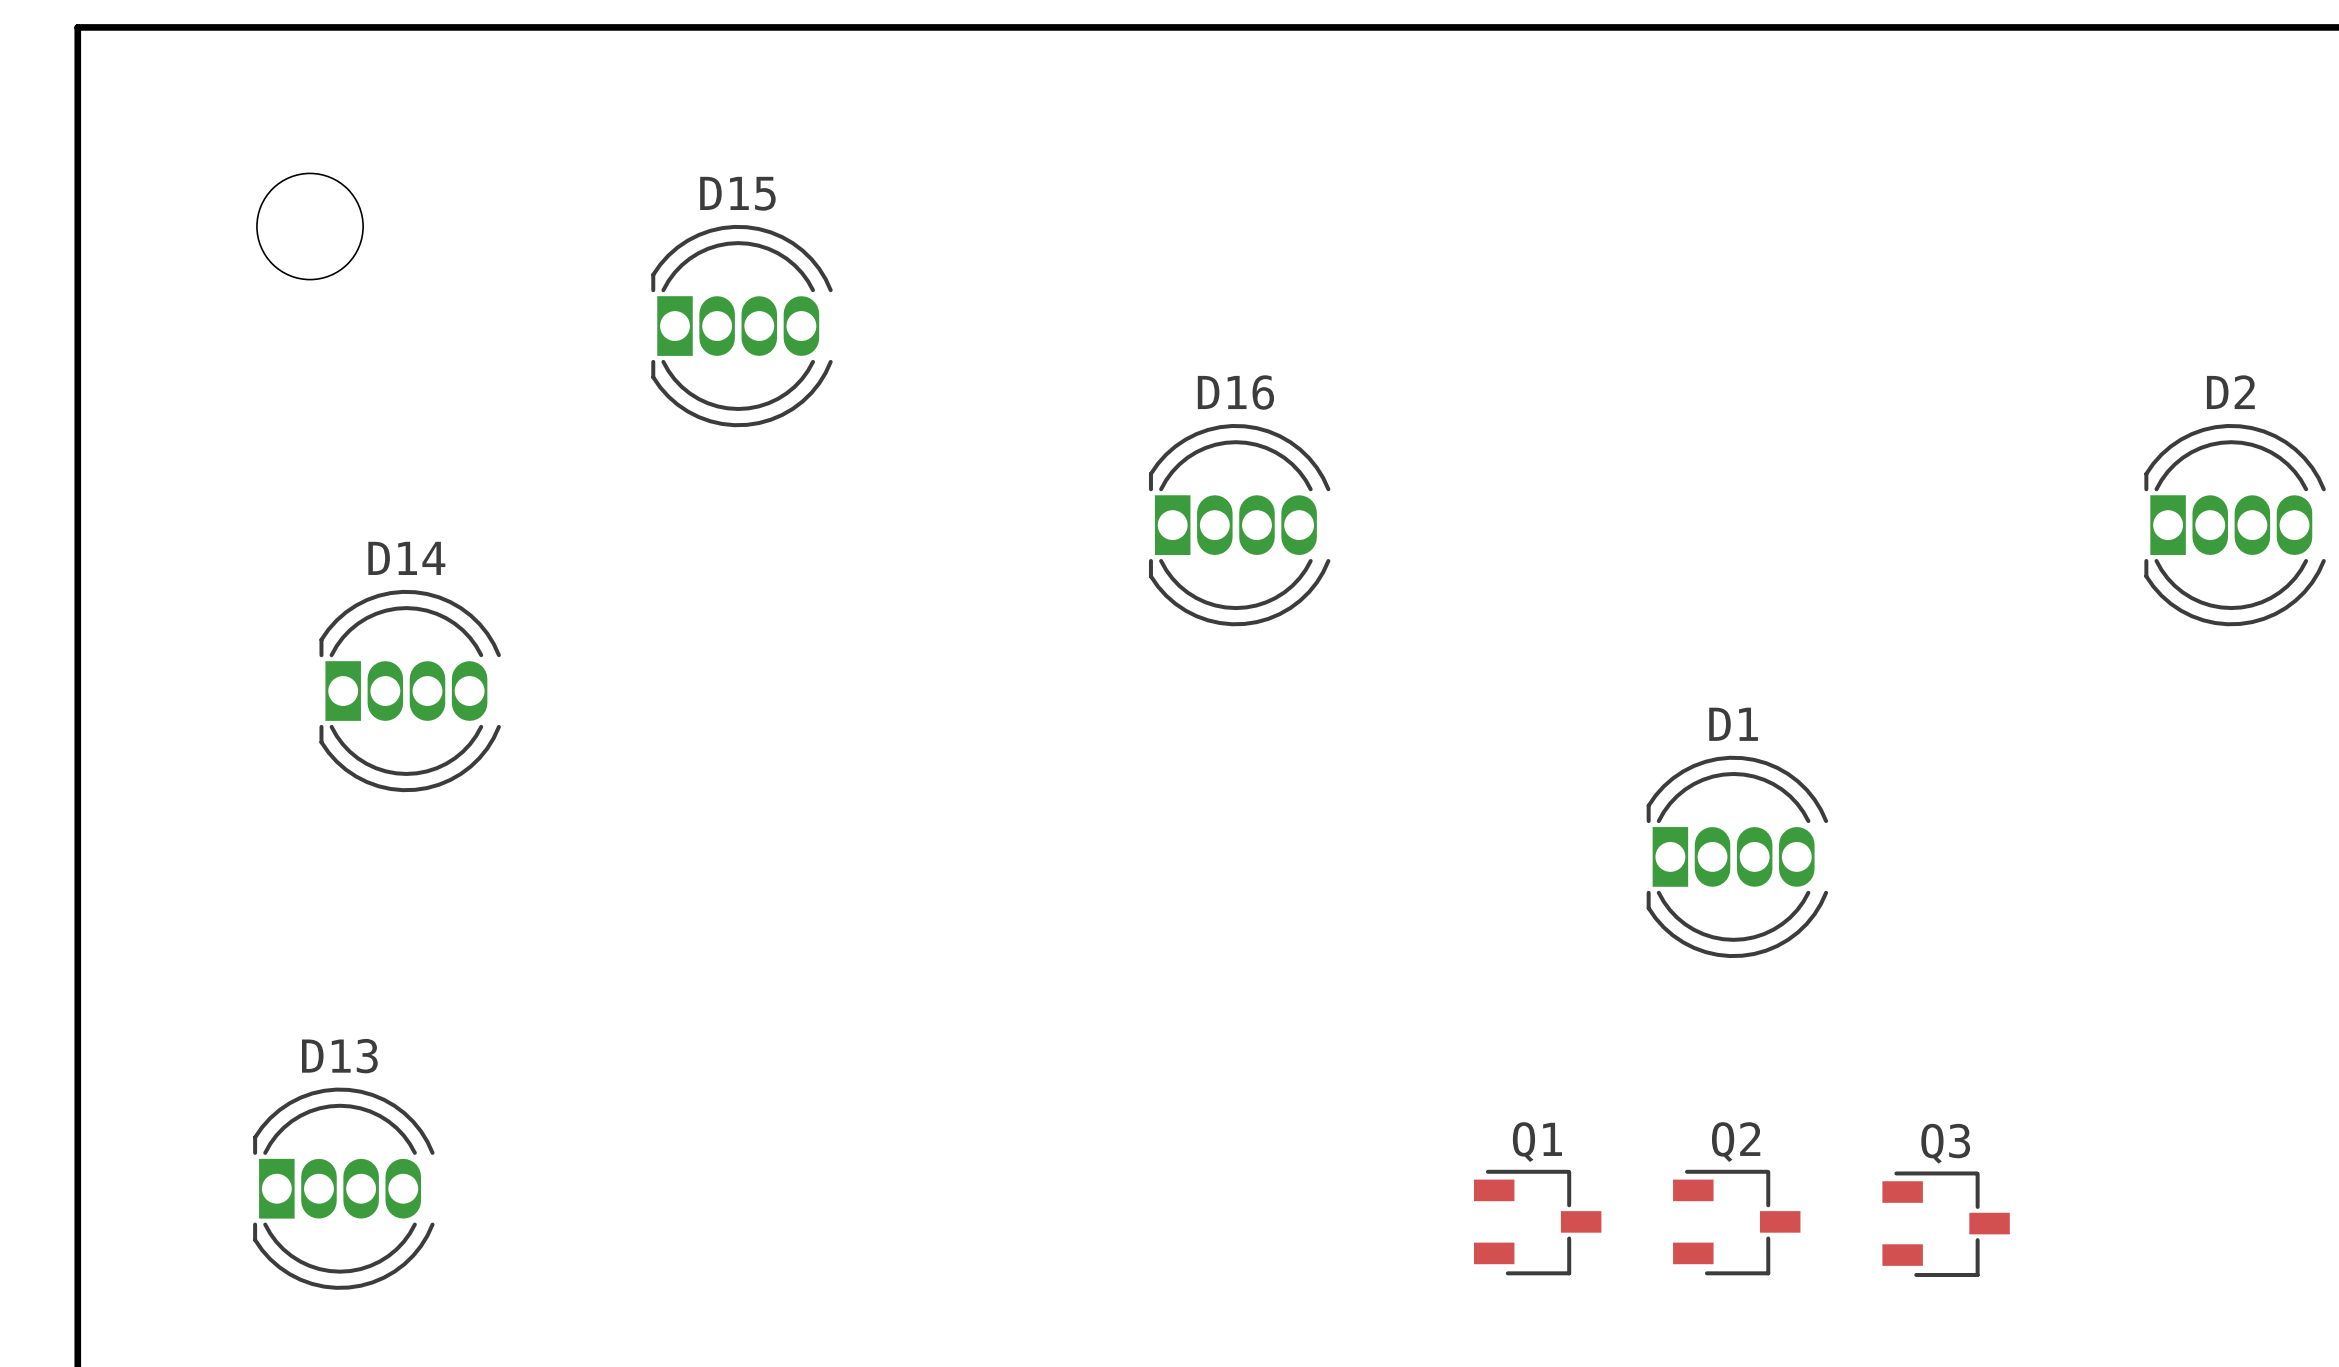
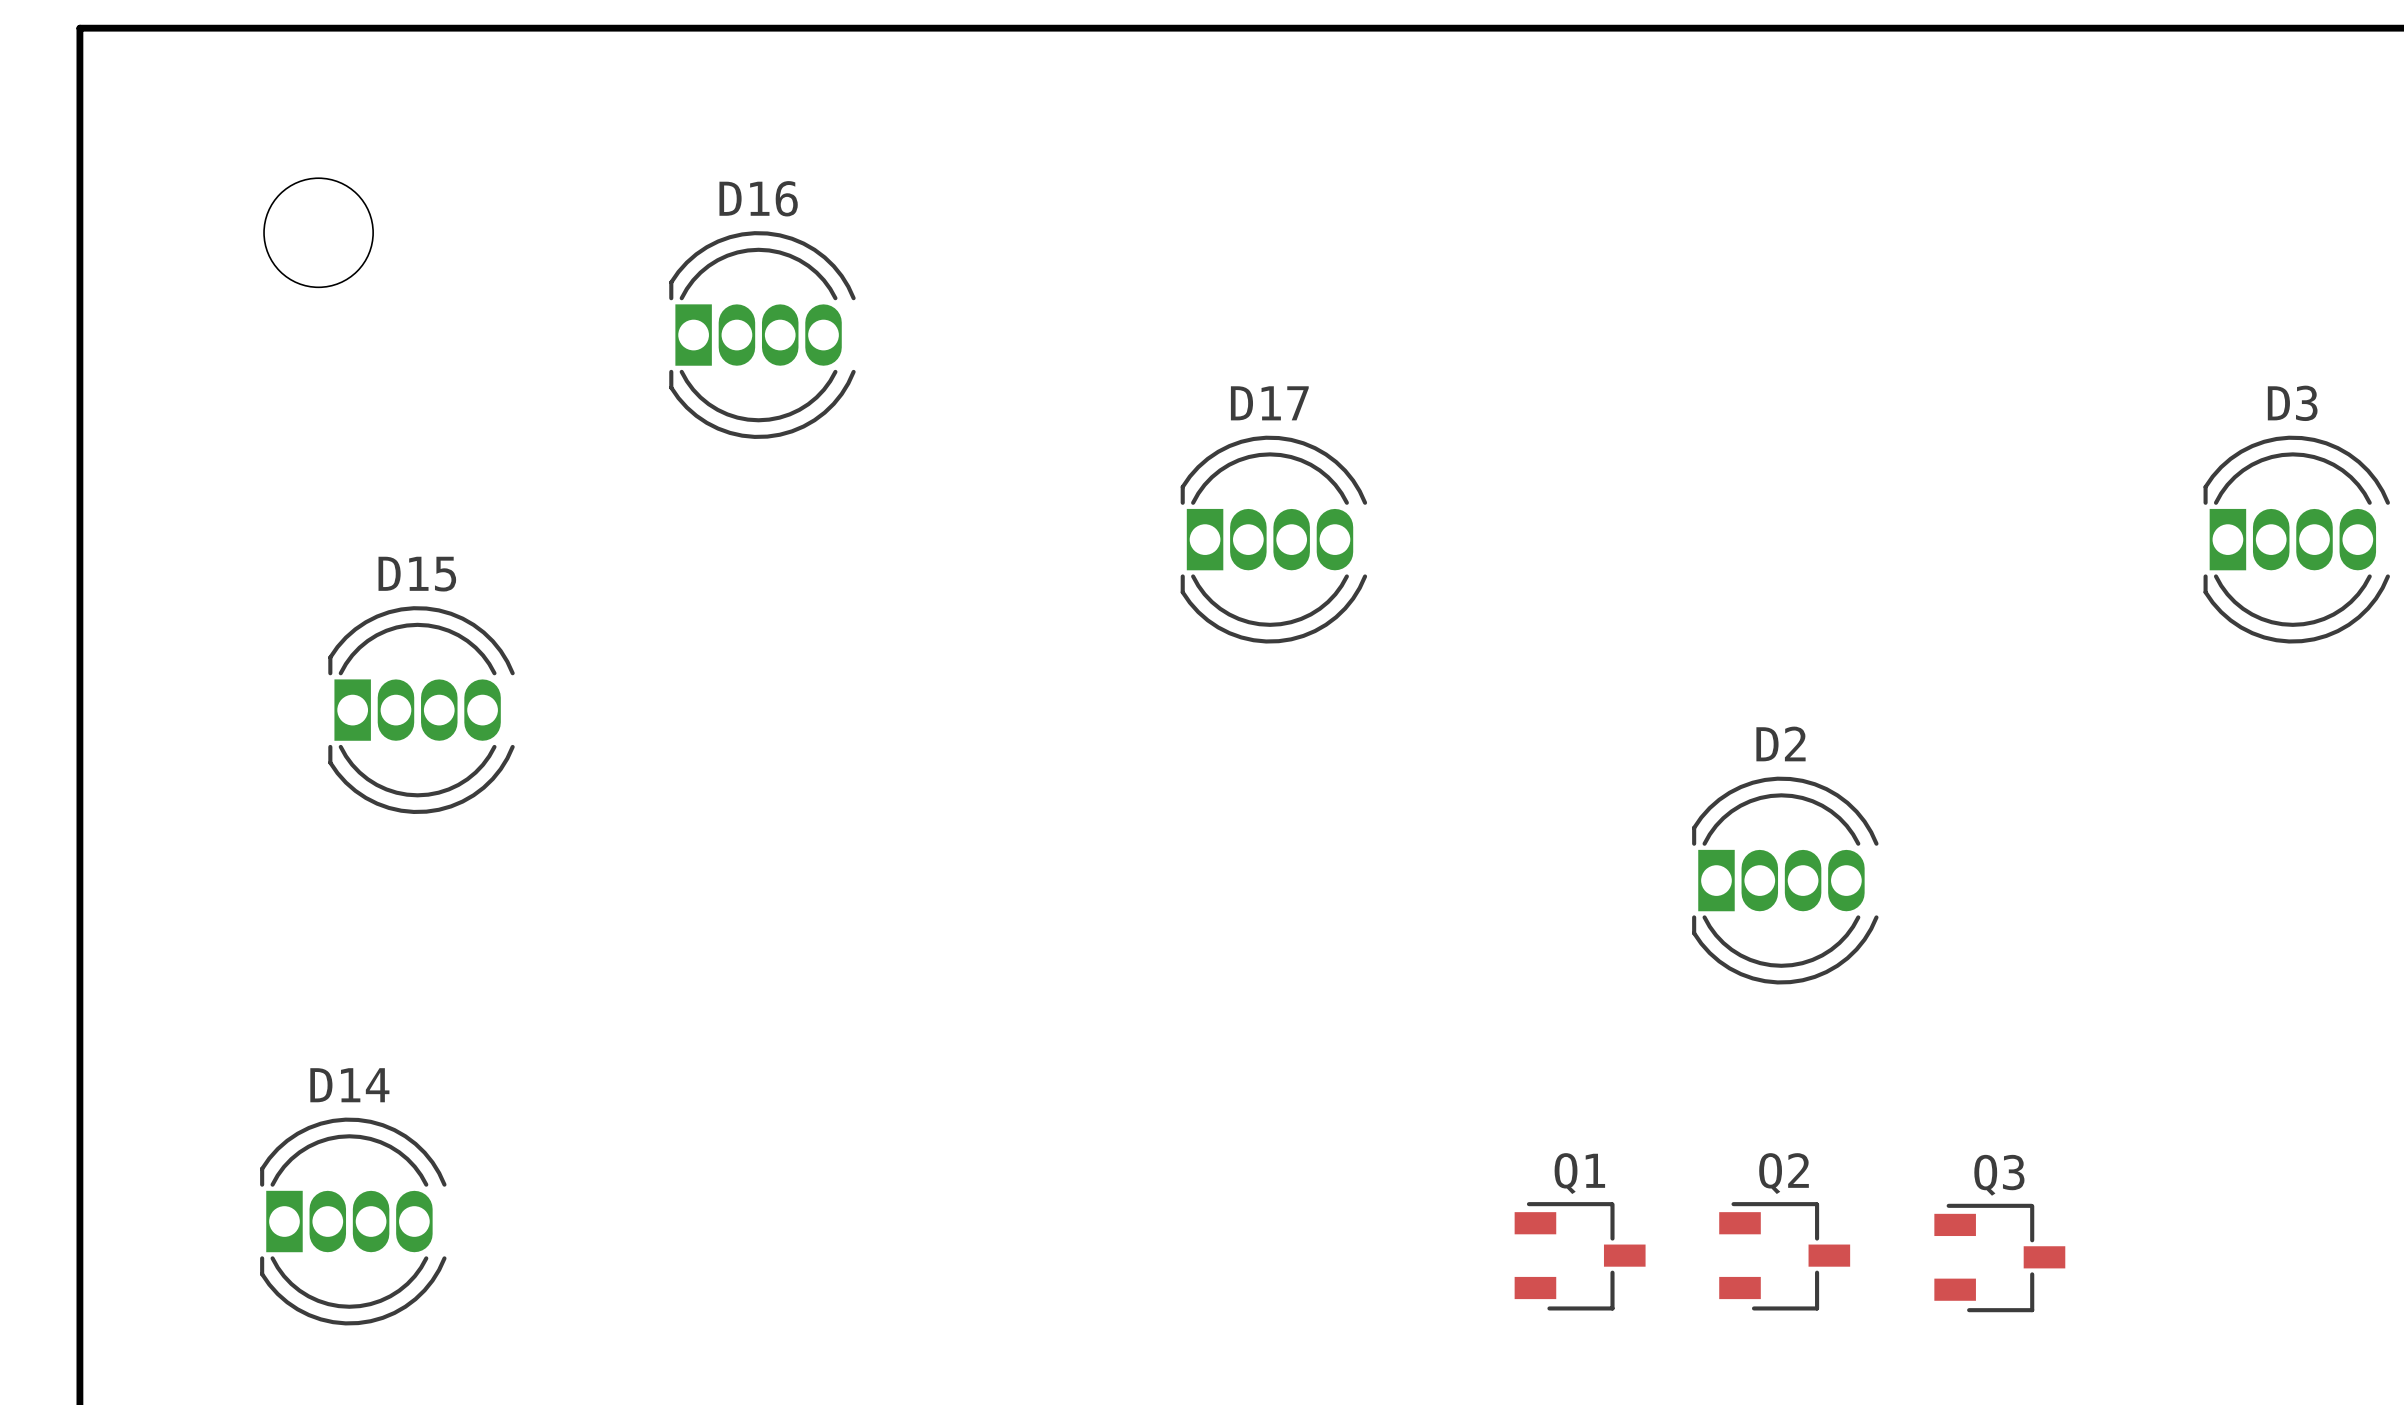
D15 name: D15 (737, 193) -> D16 (758, 198)
D16 name: D16 (1235, 392) -> D17 (1269, 403)
D2 name: D2 (2230, 392) -> D3 (2292, 403)
D14 name: D14 (406, 558) -> D15 (417, 574)
D1 name: D1 (1733, 724) -> D2 (1781, 743)
D13 name: D13 (339, 1056) -> D14 (349, 1085)

